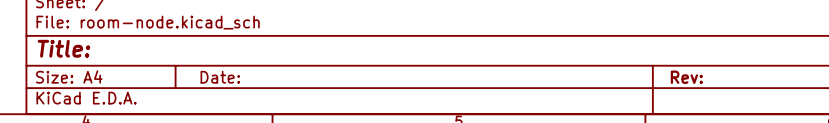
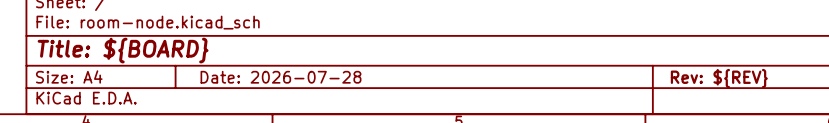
title block: Title: (63, 48) -> Title: ${BOARD} (123, 50)
title block: Date: (220, 77) -> Date: 2026-07-28 (281, 77)
title block: Rev: (686, 77) -> Rev: ${REV} (719, 78)

